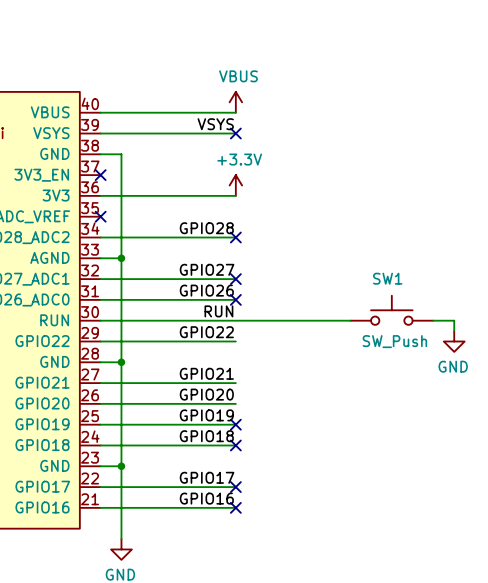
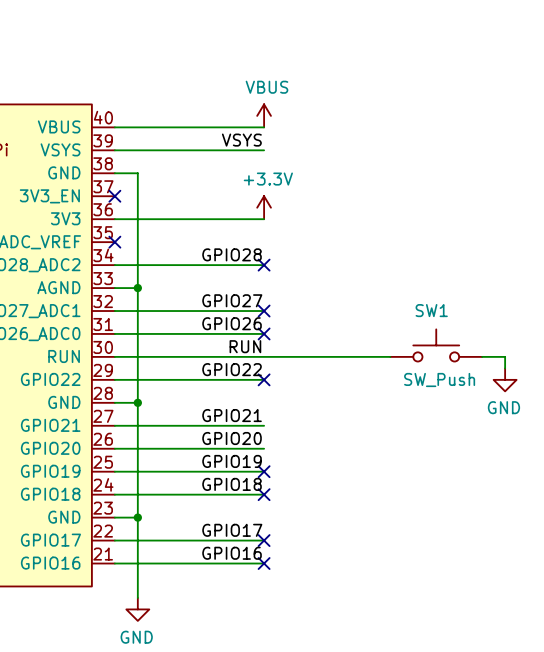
no-connect mark: (235, 133) -> none
no-connect mark: none -> (264, 379)

